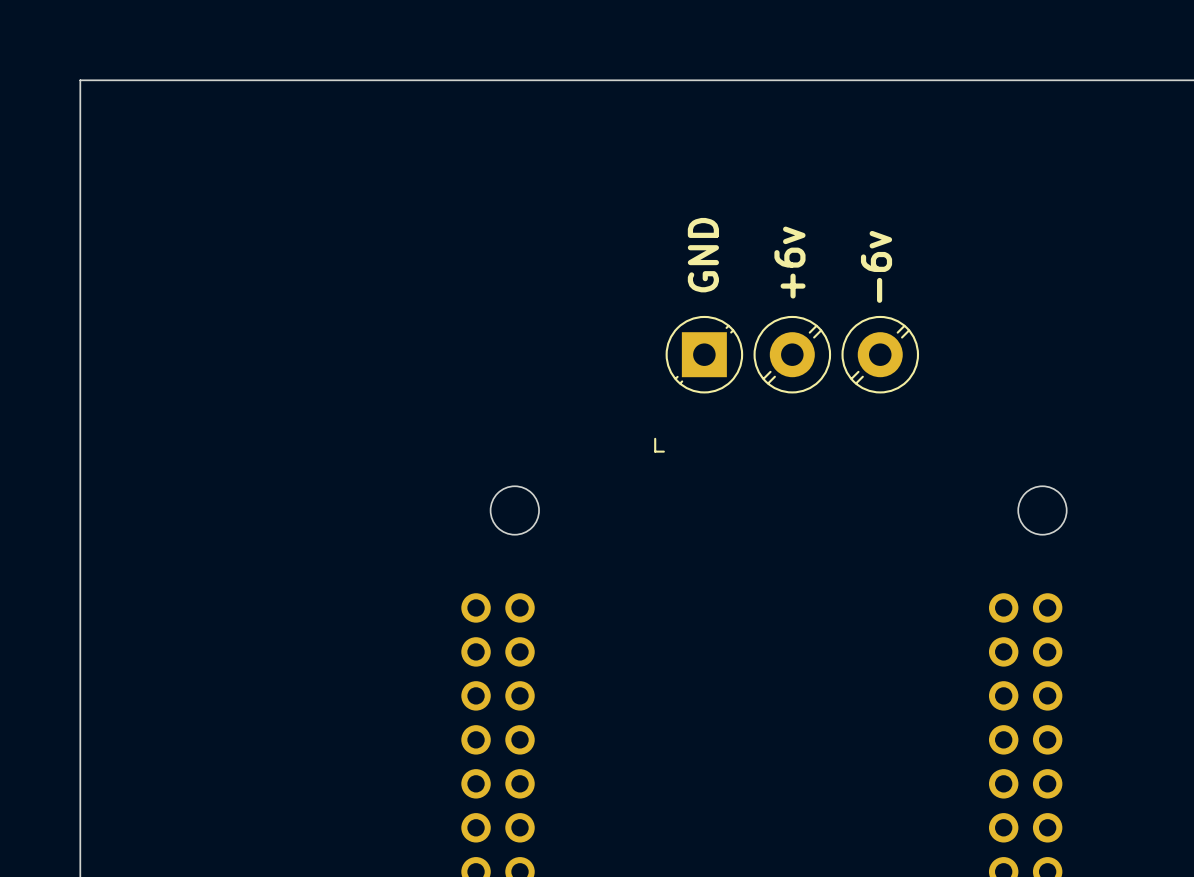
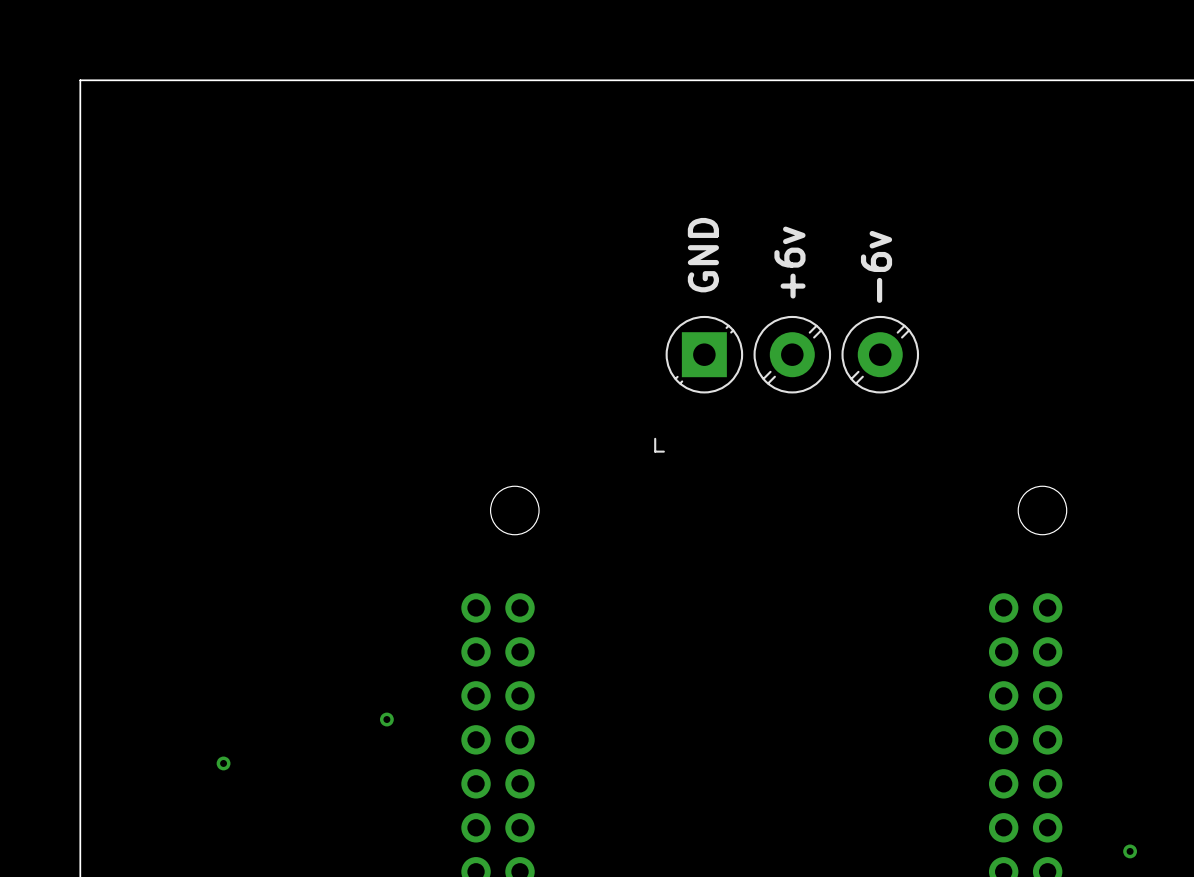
via: none -> (386, 719)
via: none -> (223, 763)
via: none -> (1130, 851)

